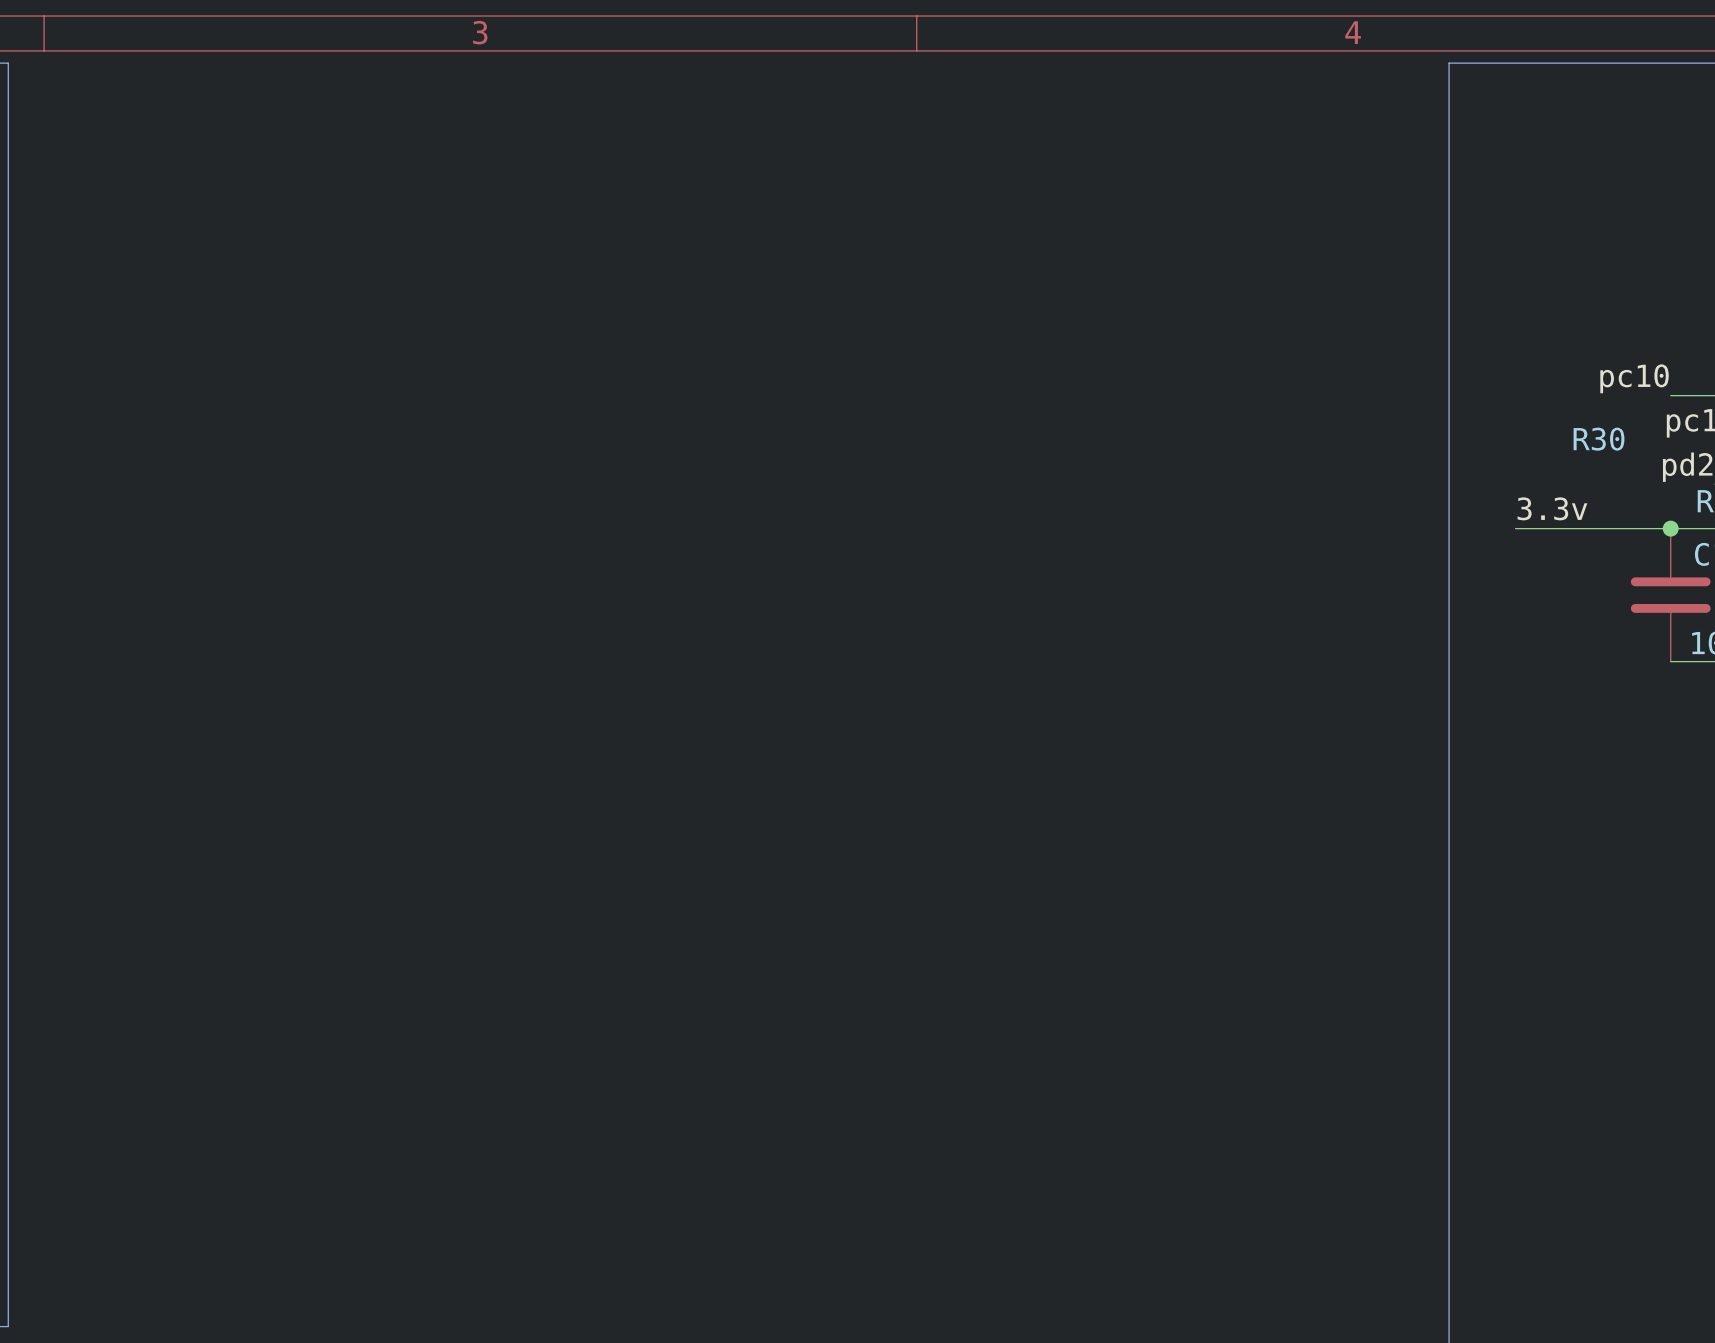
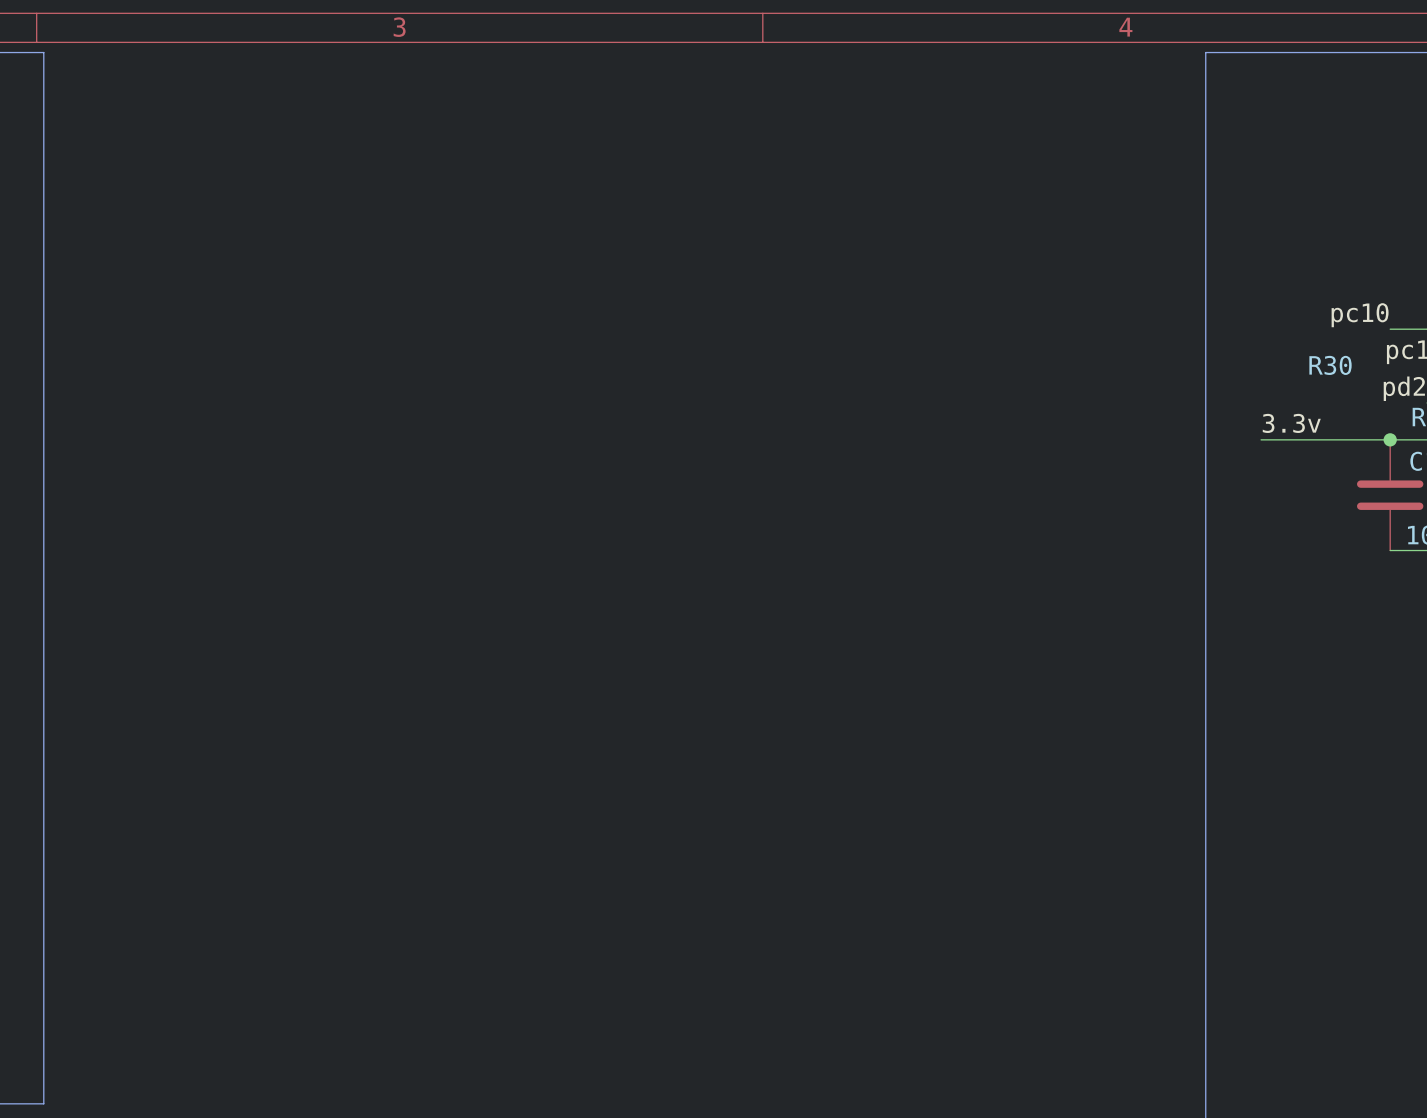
line: (8, 63) (8, 1326) -> (6, 52) (43, 52) (43, 1103) (6, 1103)

